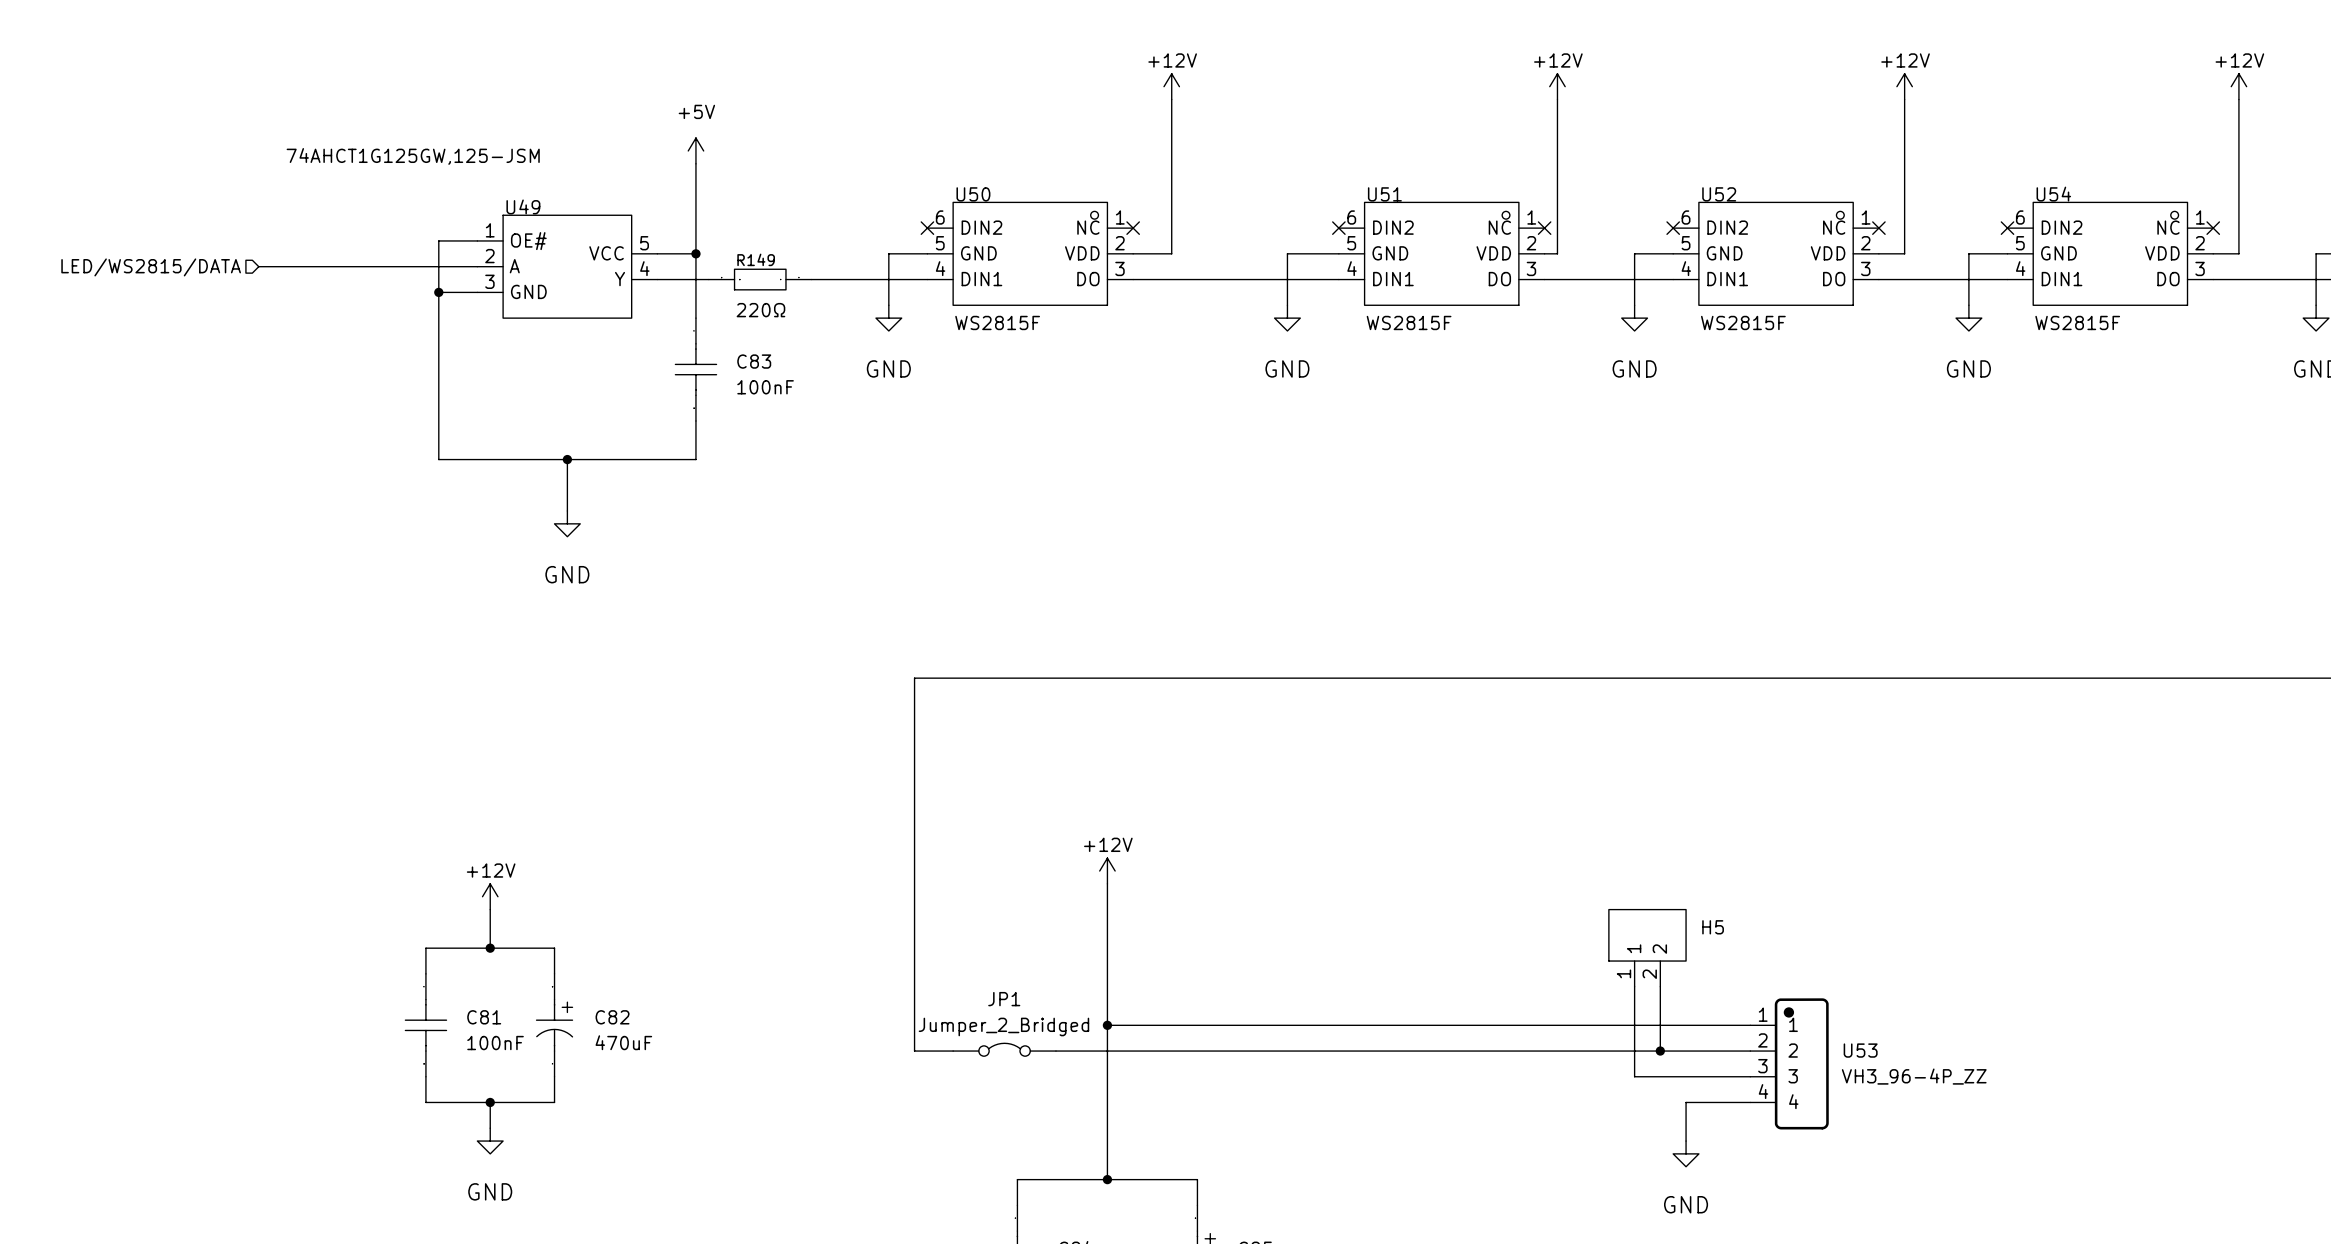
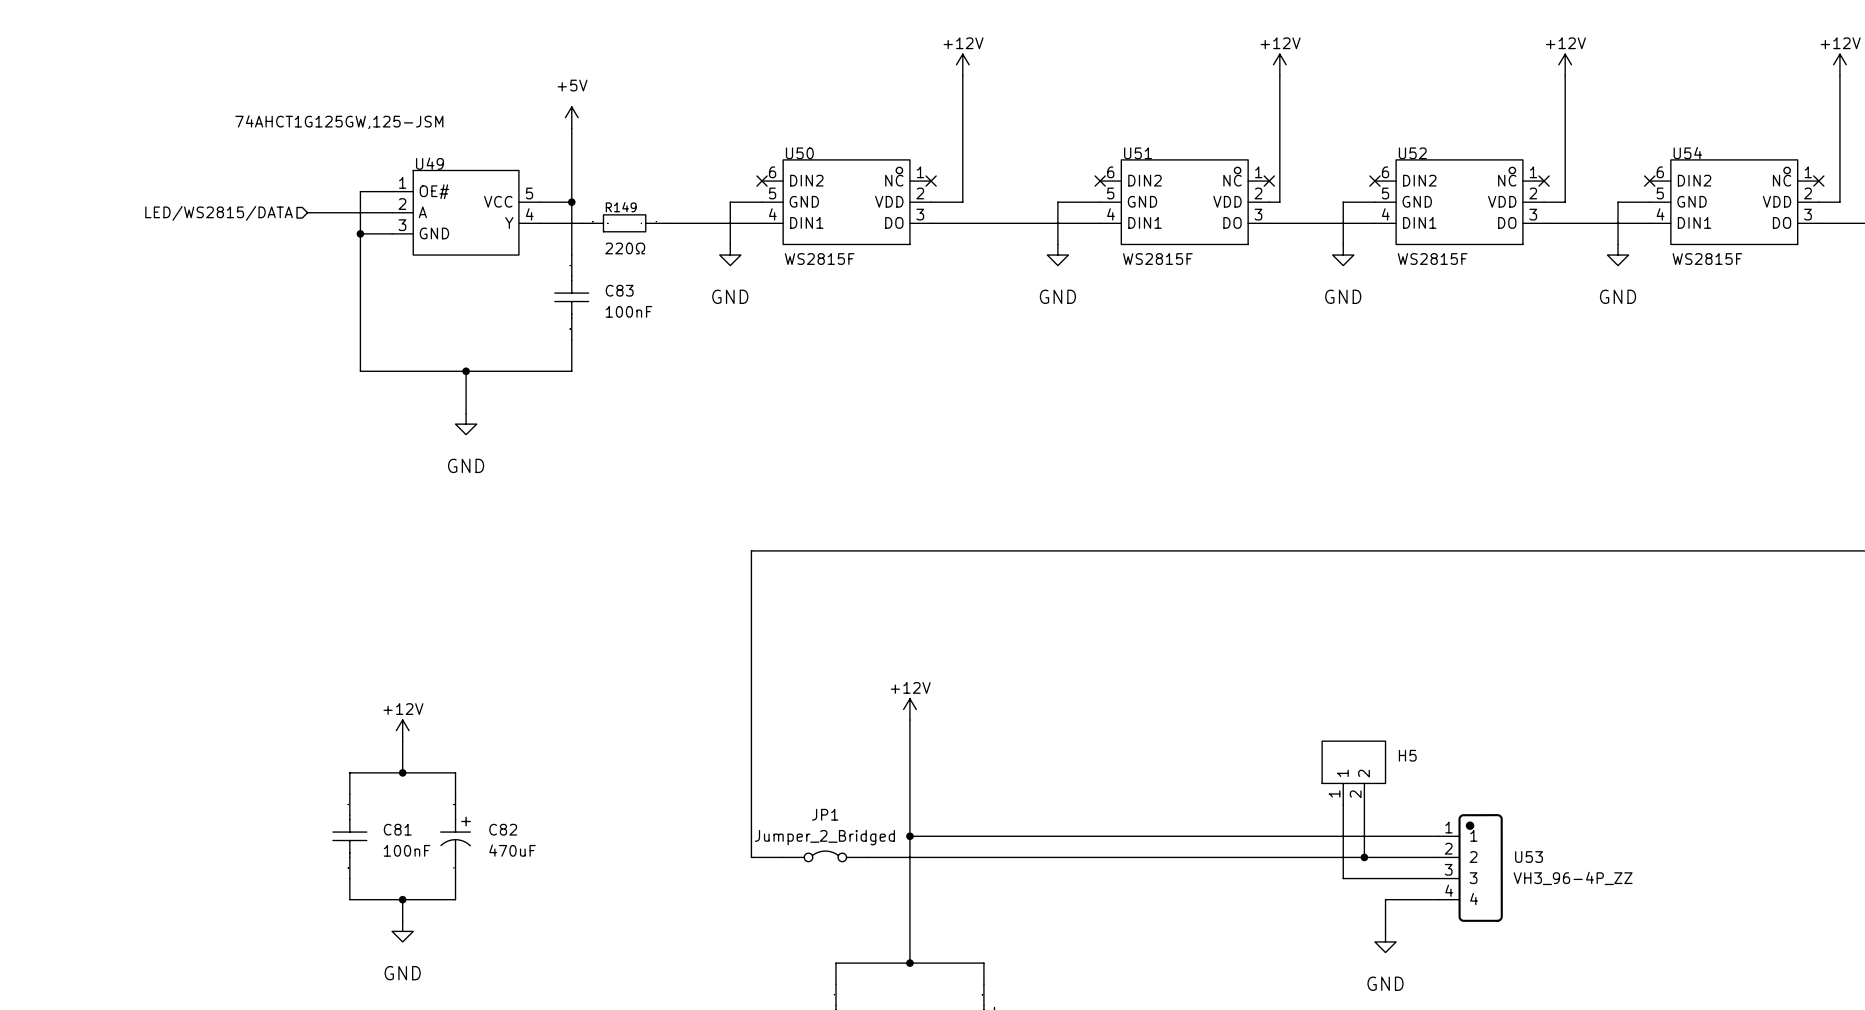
wire: (258, 266) (374, 266) -> none
hierarchical label position: LED/WS2815/DATA (151, 267) -> LED/WS2815/DATA (219, 213)

